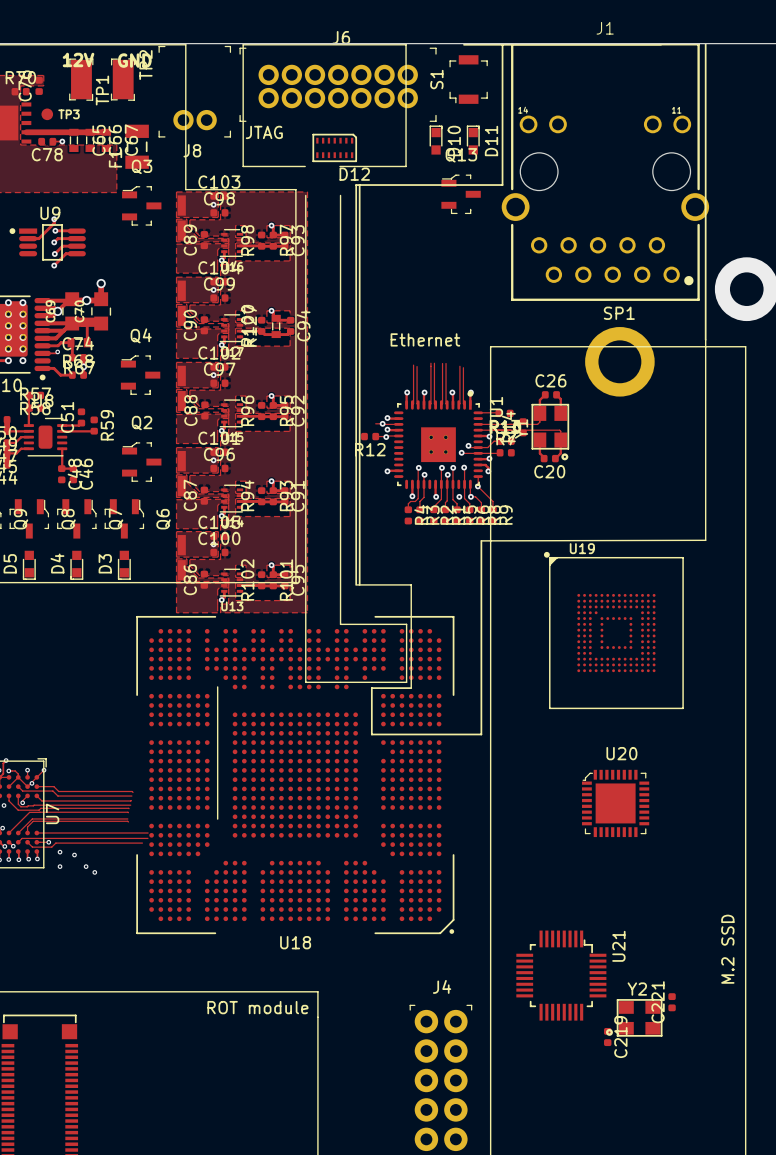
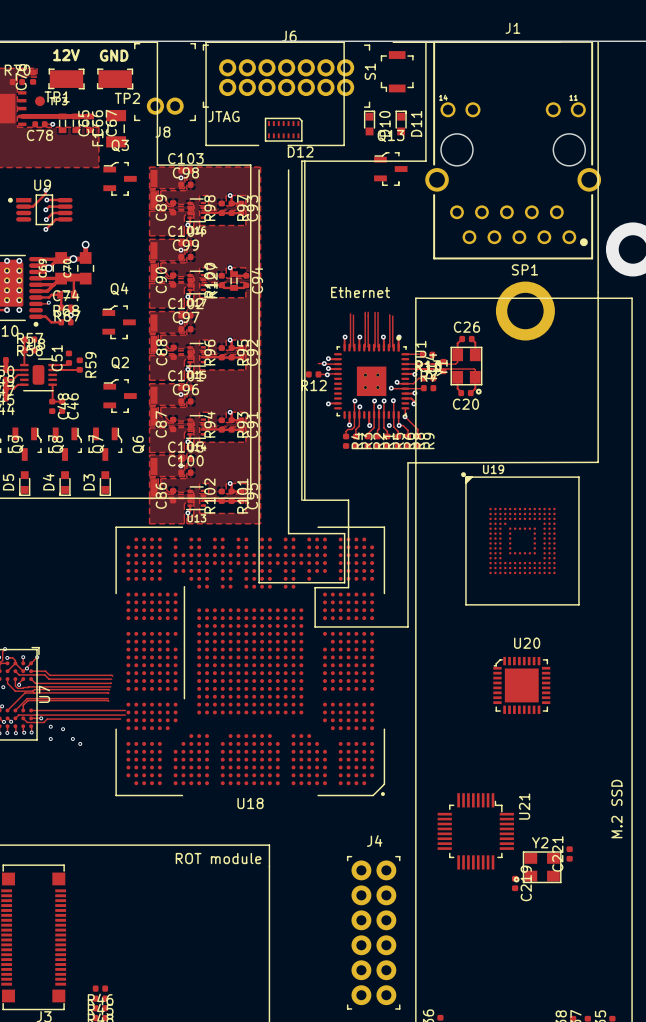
TP1 rotation: 0° (81, 79) -> 90° clockwise (66, 78)
TP2 rotation: 0° (123, 79) -> 90° clockwise (115, 78)

